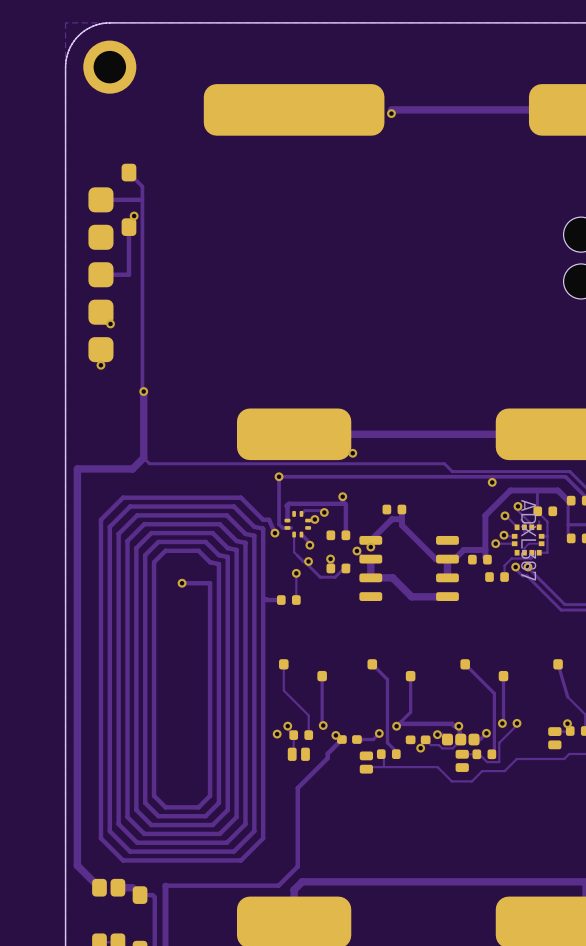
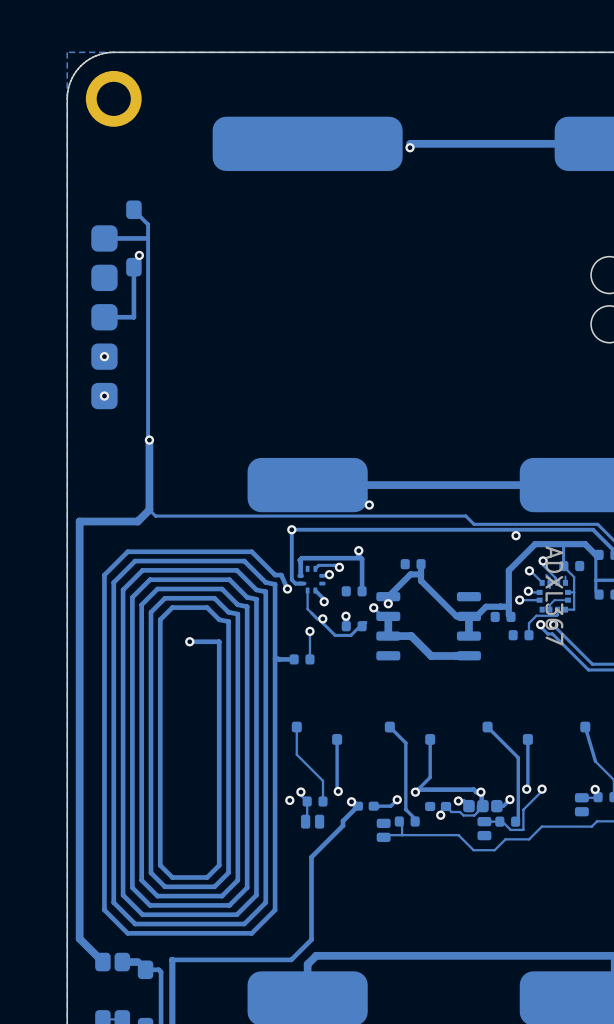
via: none -> (104, 356)
via: (110, 323) -> none
via: none -> (104, 396)
via: (100, 365) -> none

